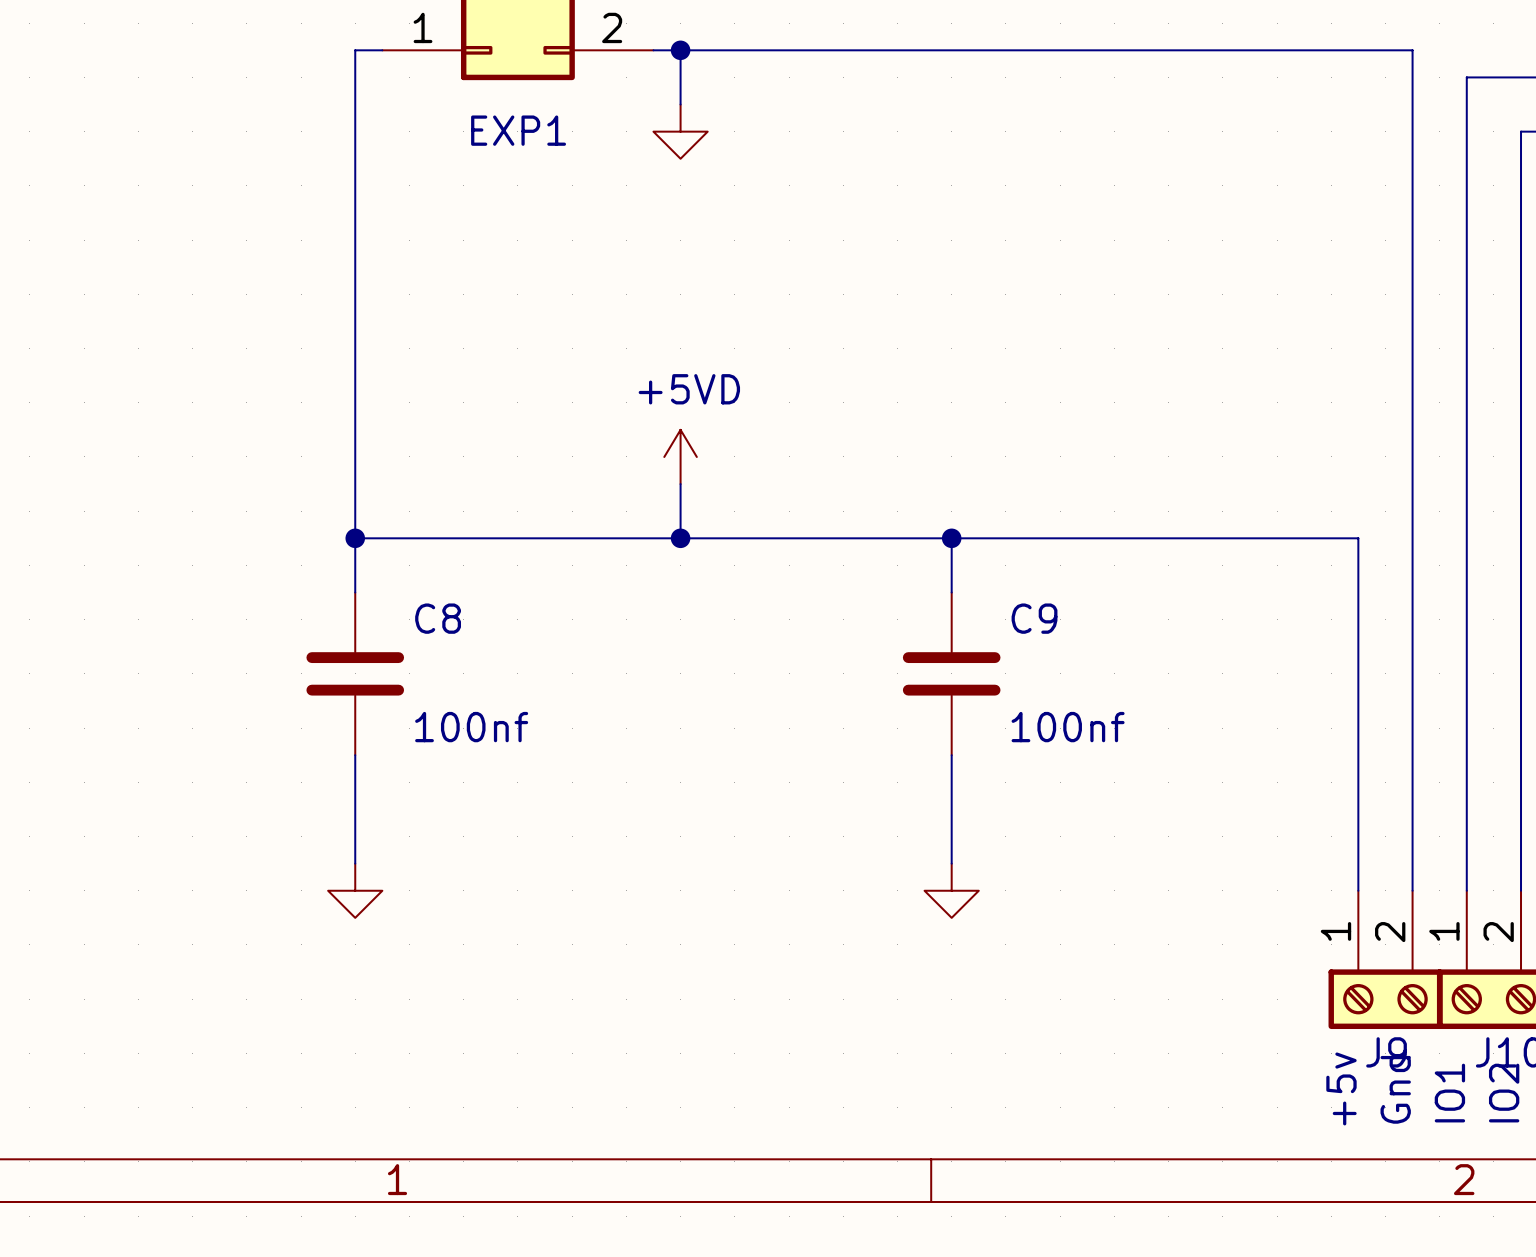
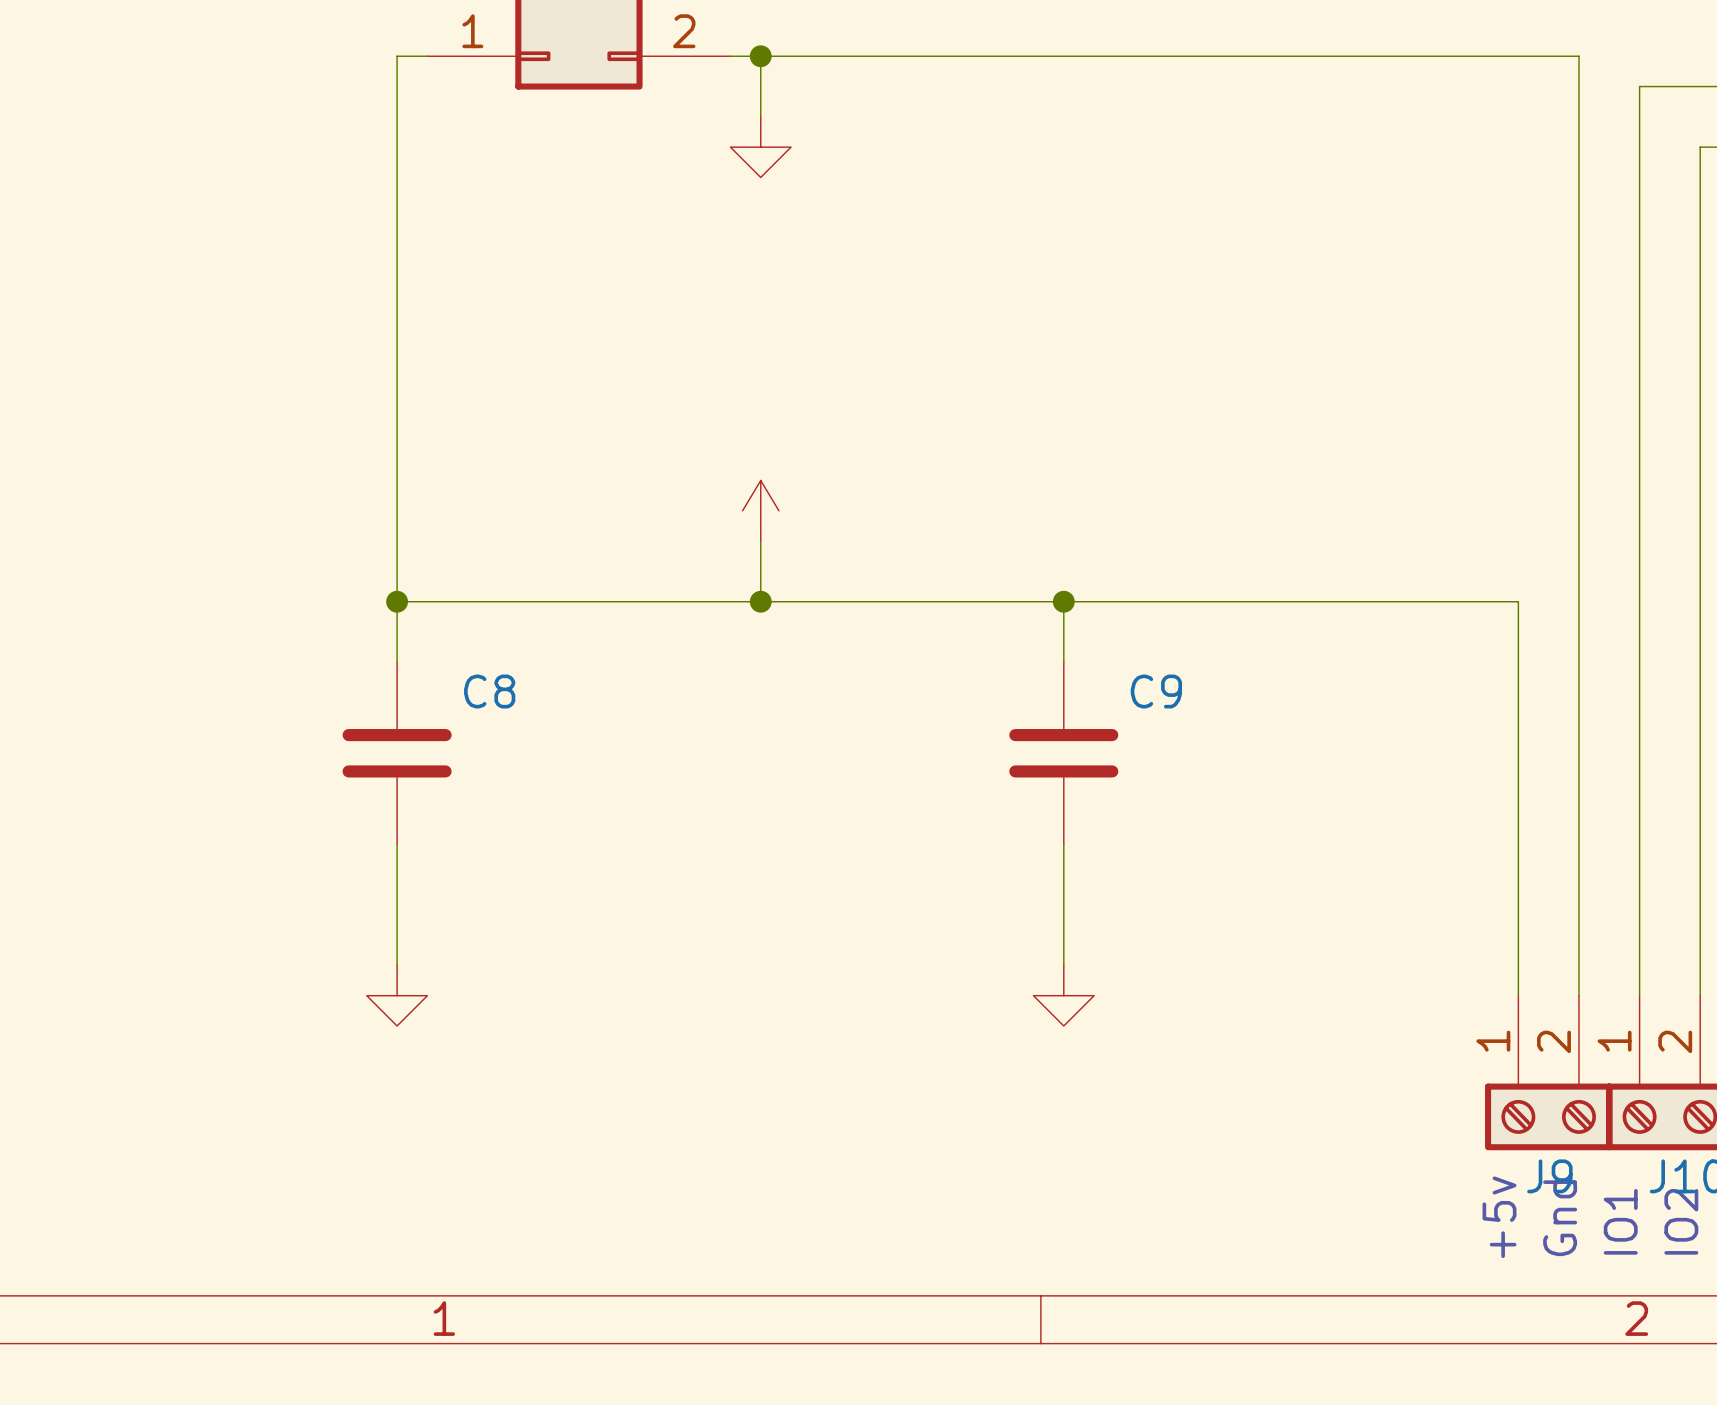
part value: EXP1 (518, 130) -> none
power symbol text: +5VD (689, 389) -> none
C8 value: 100nf (471, 727) -> none
C9 value: 100nf (1068, 727) -> none

